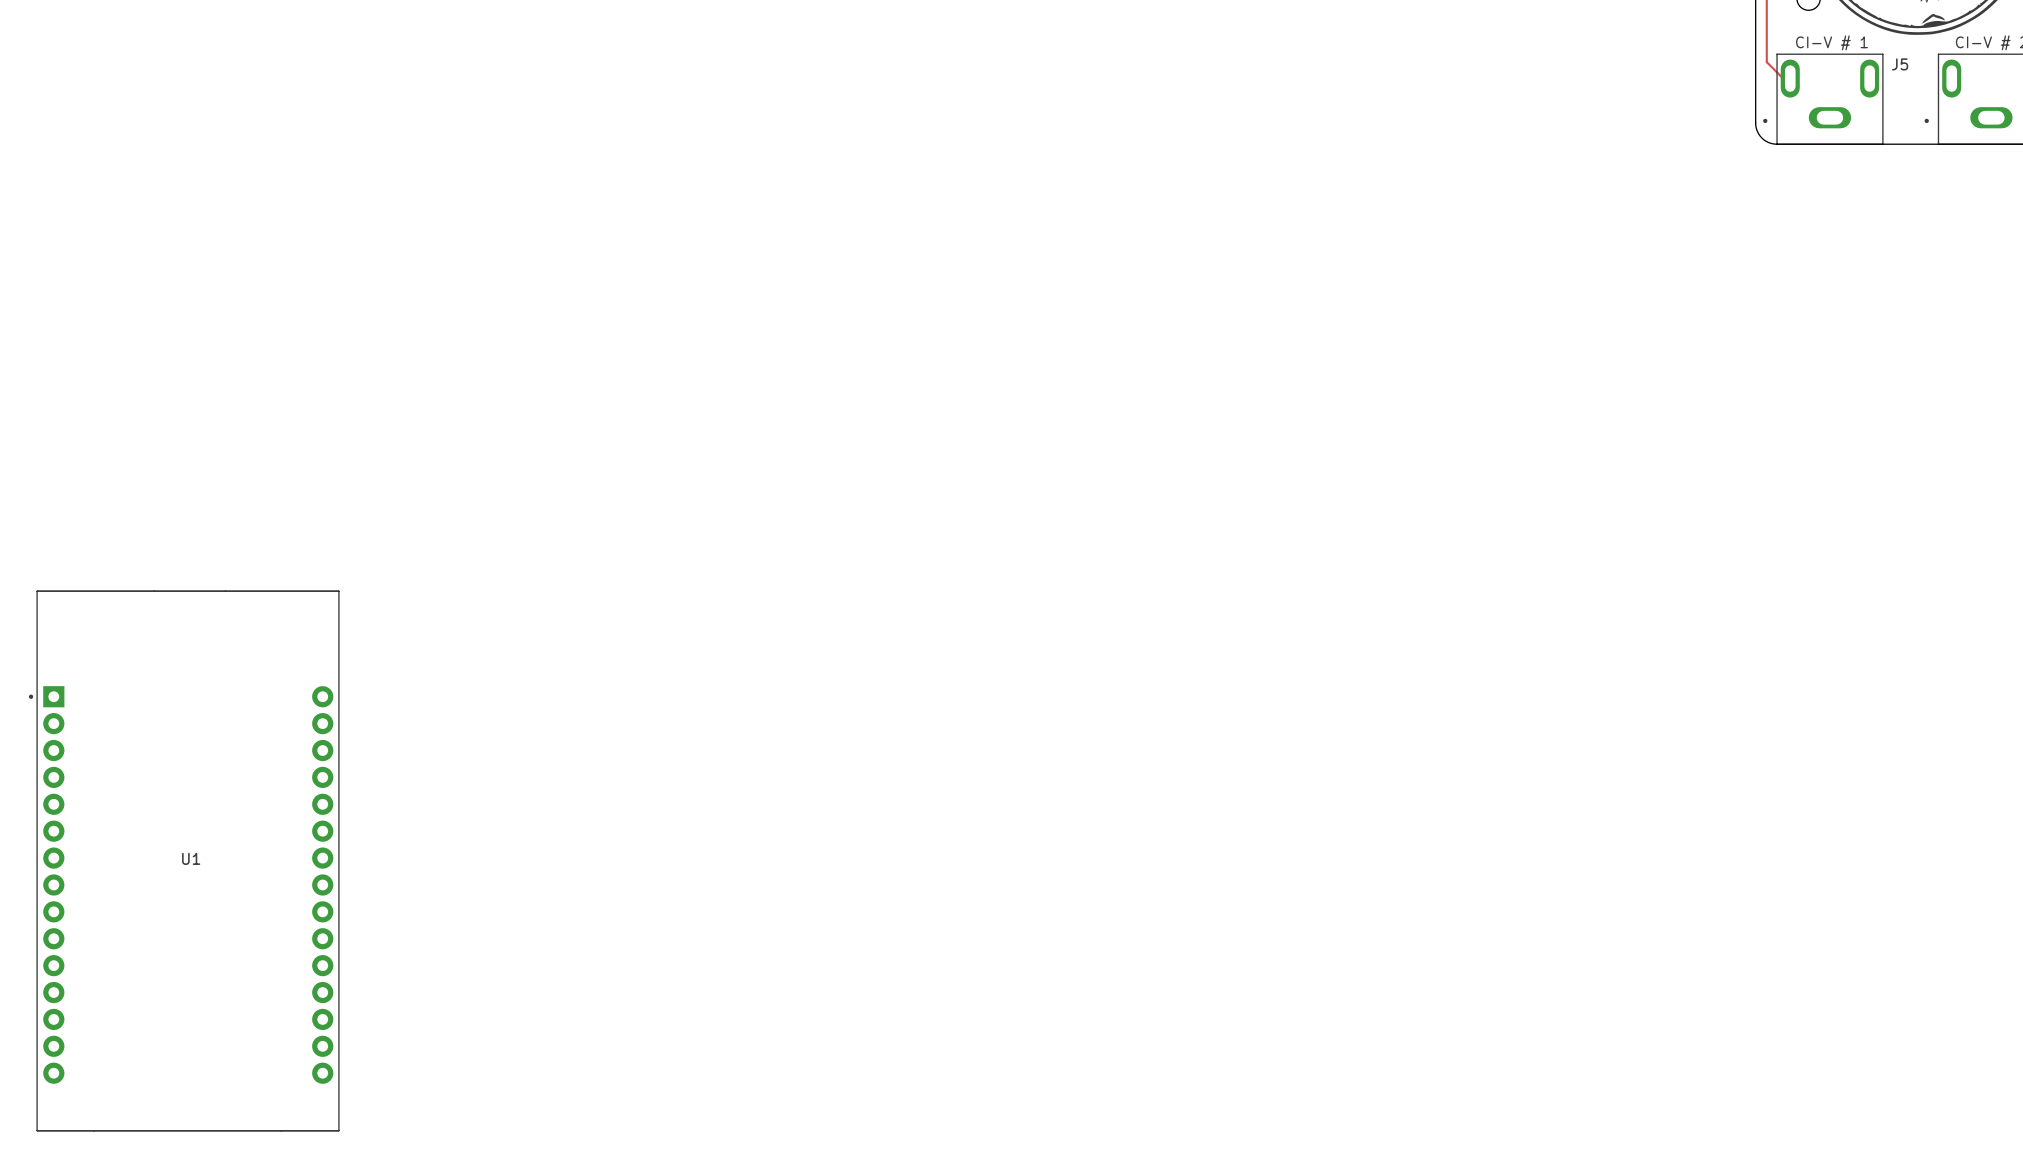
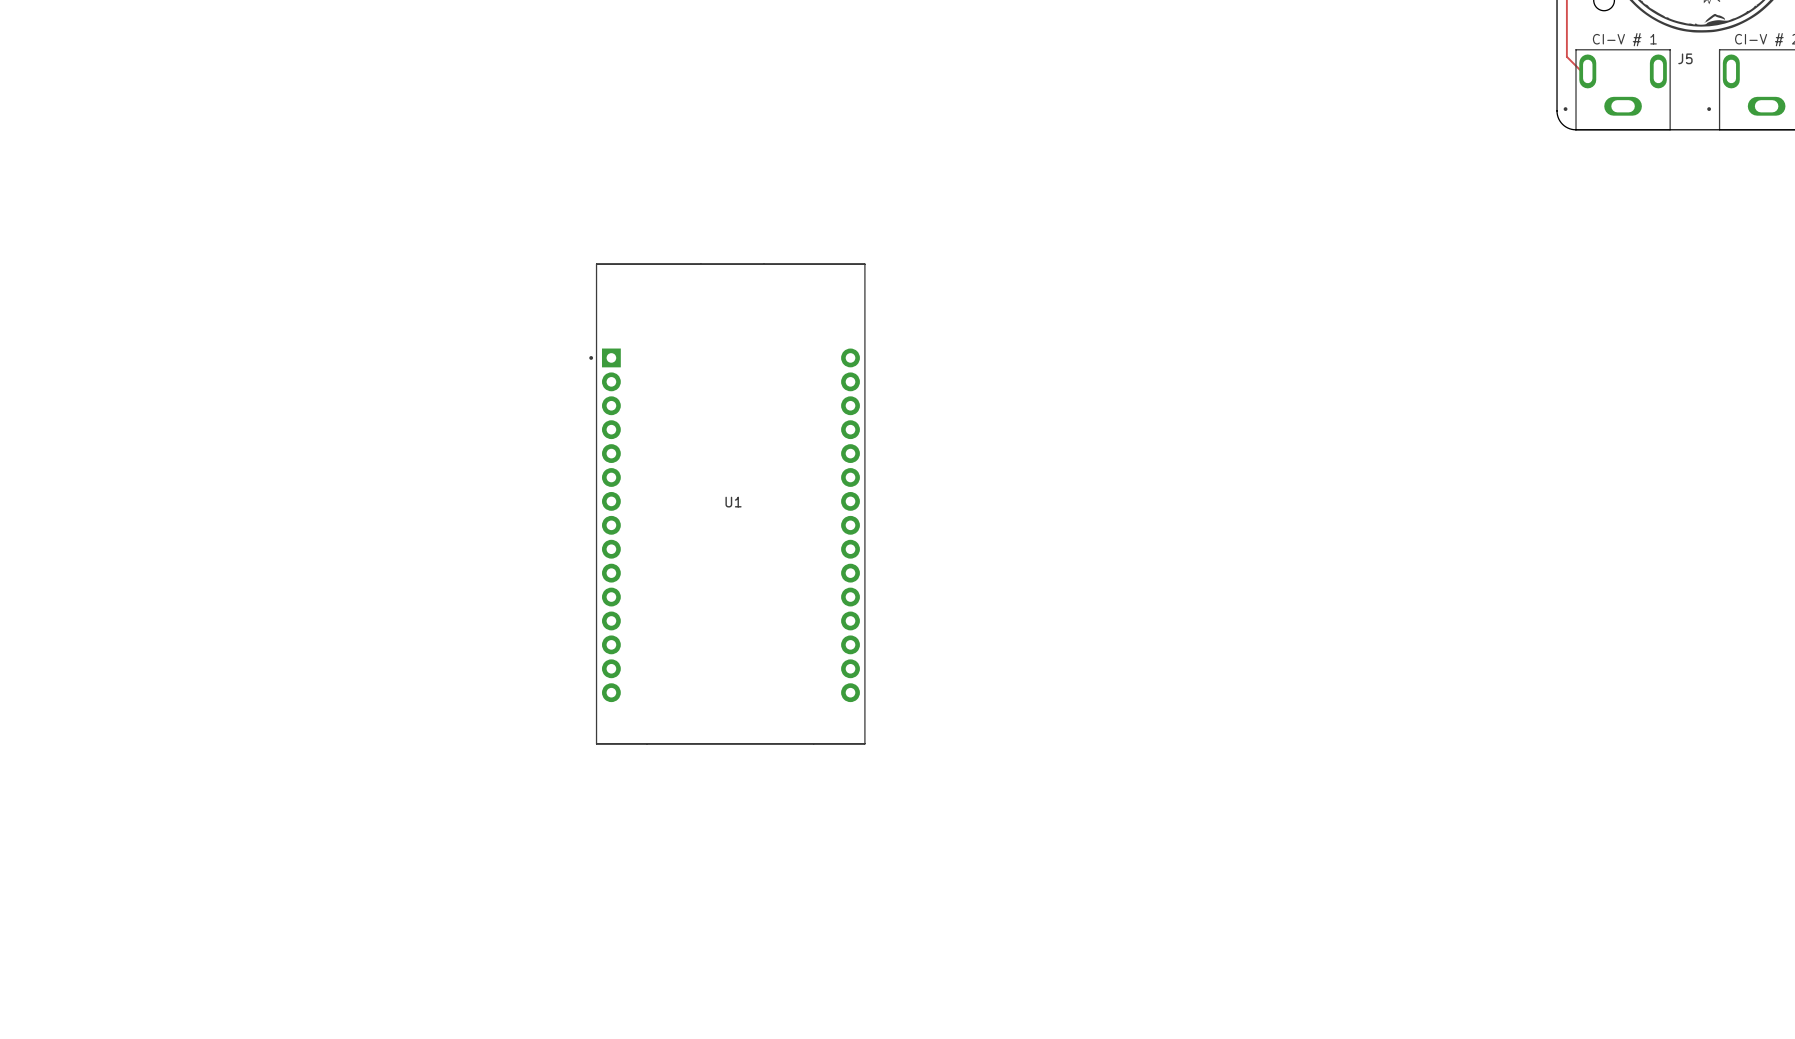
U1 position: (184, 860) -> (727, 503)

